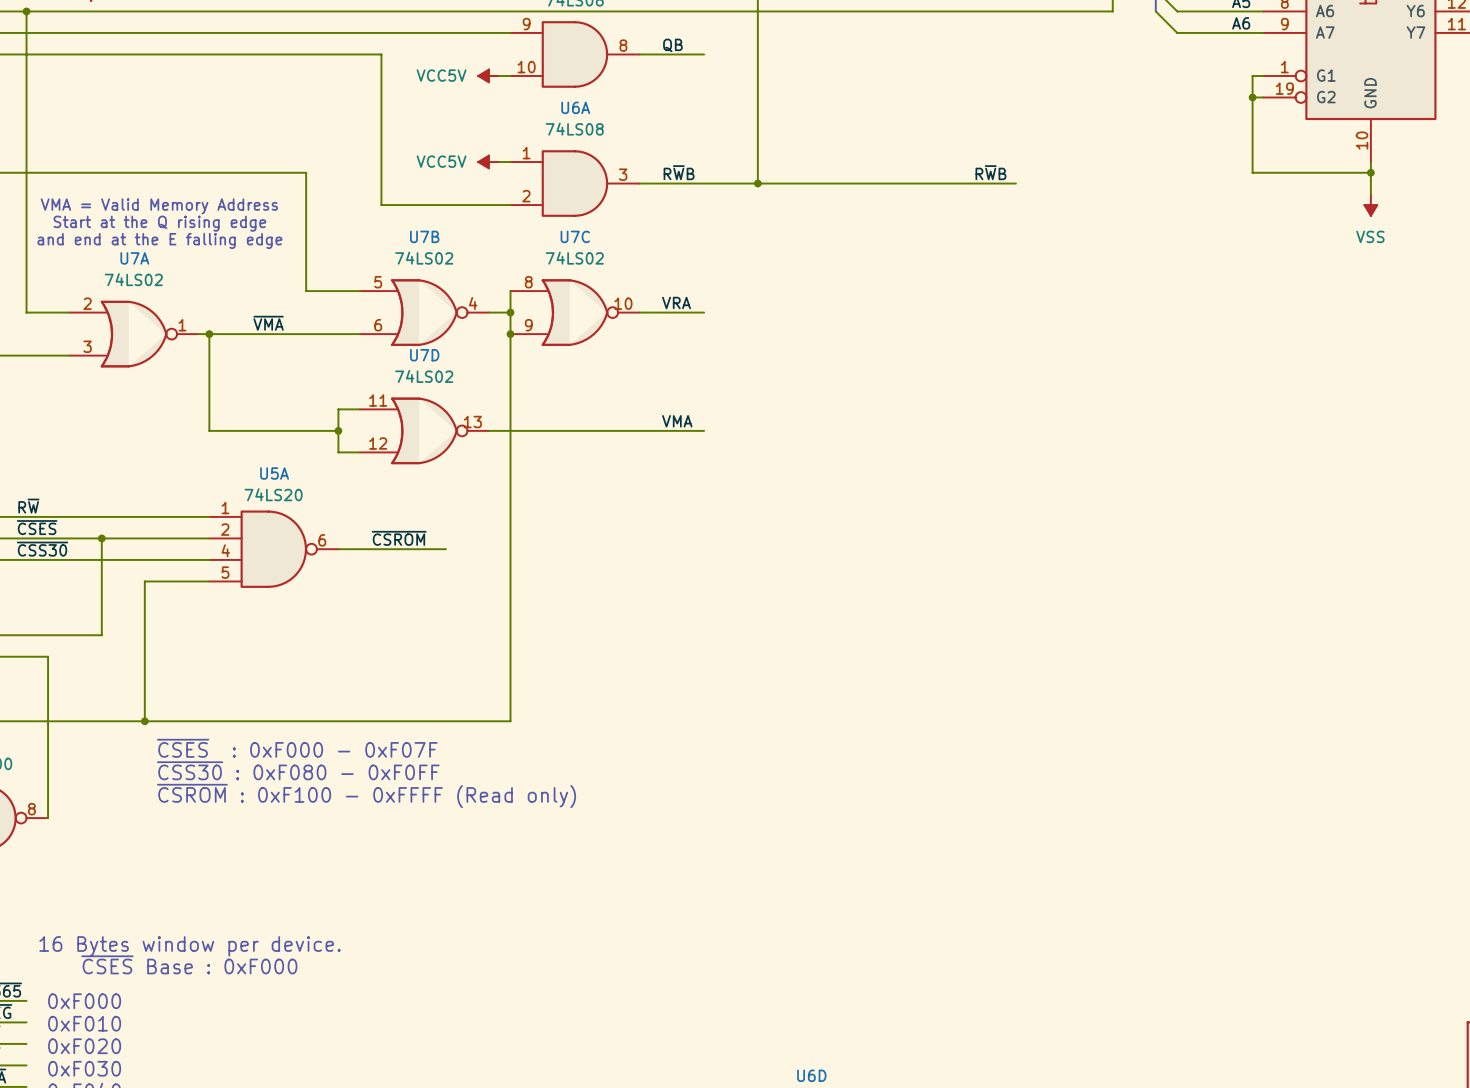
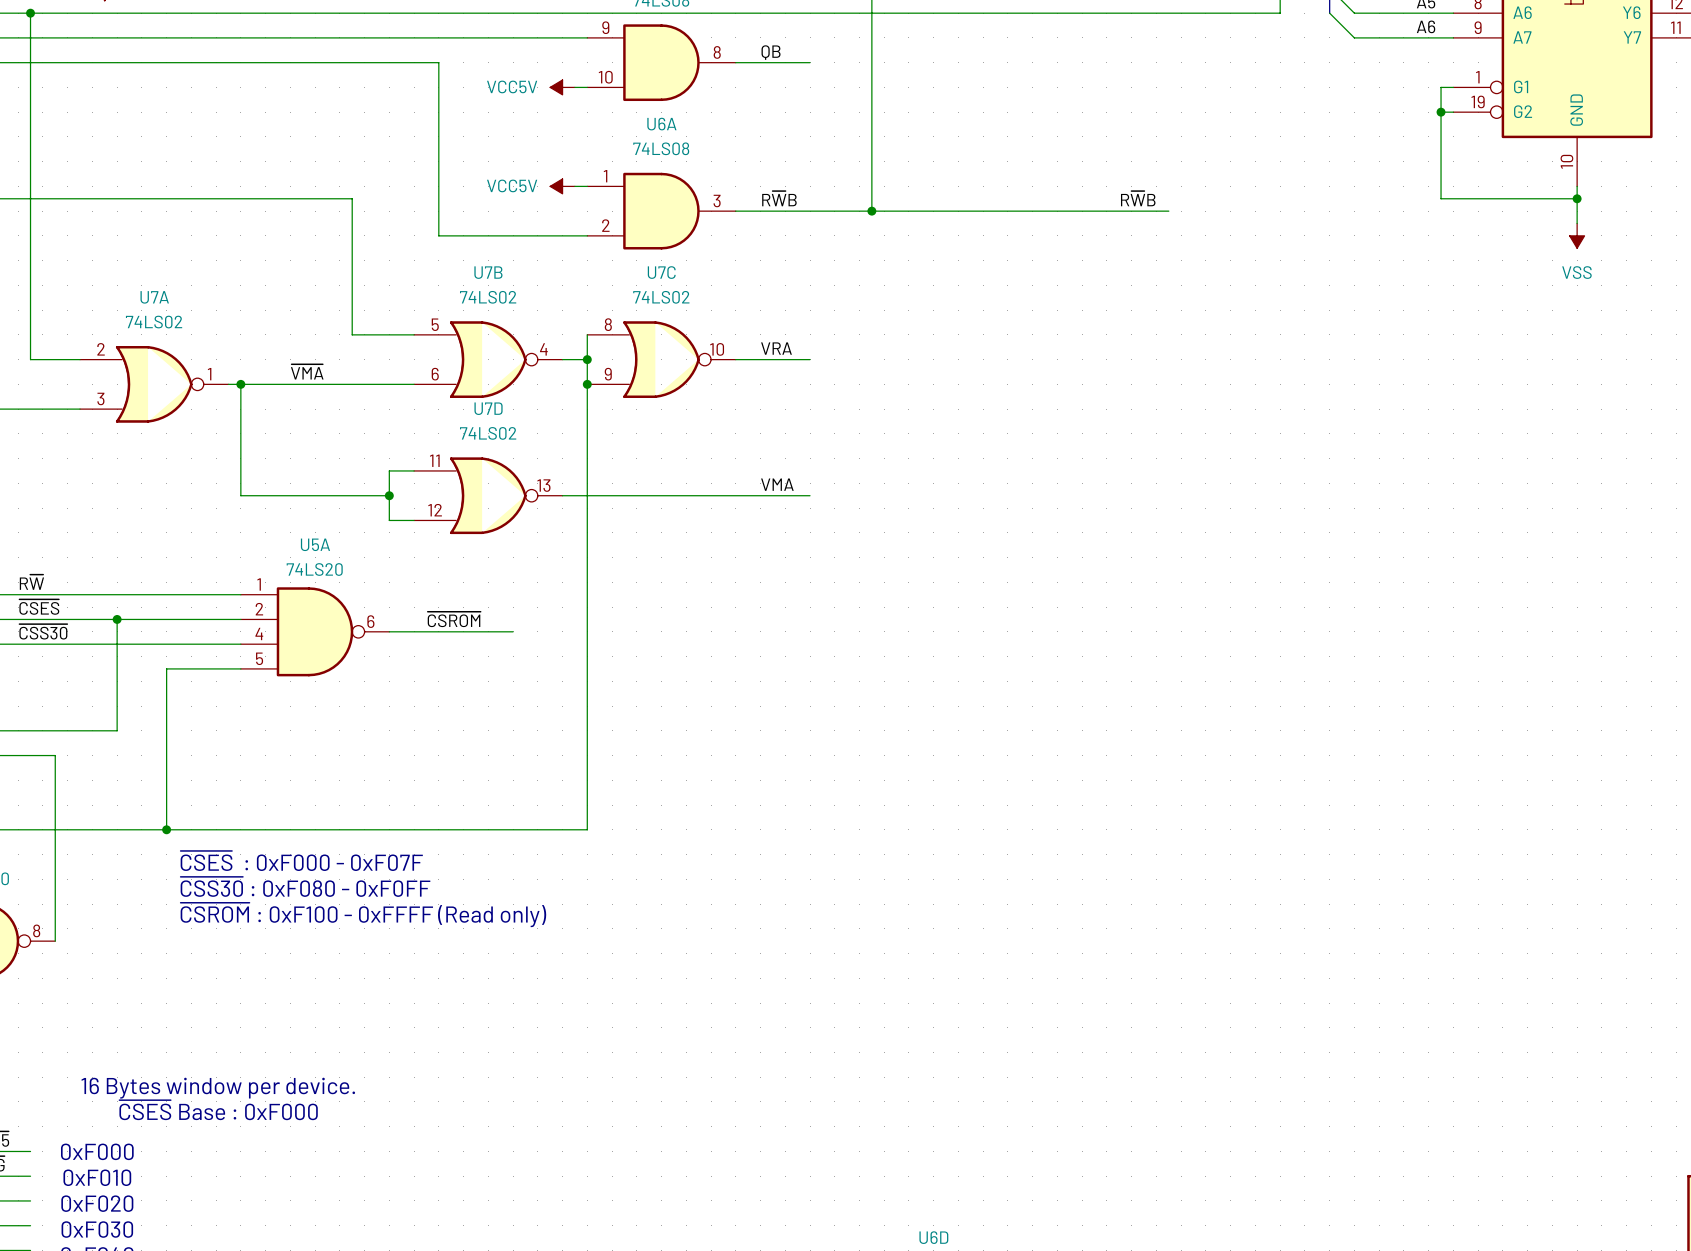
text: VMA = Valid Memory Address (159, 206) -> none
text: Start at the Q rising edge (159, 223) -> none
text: and end at the E falling edge (159, 240) -> none

